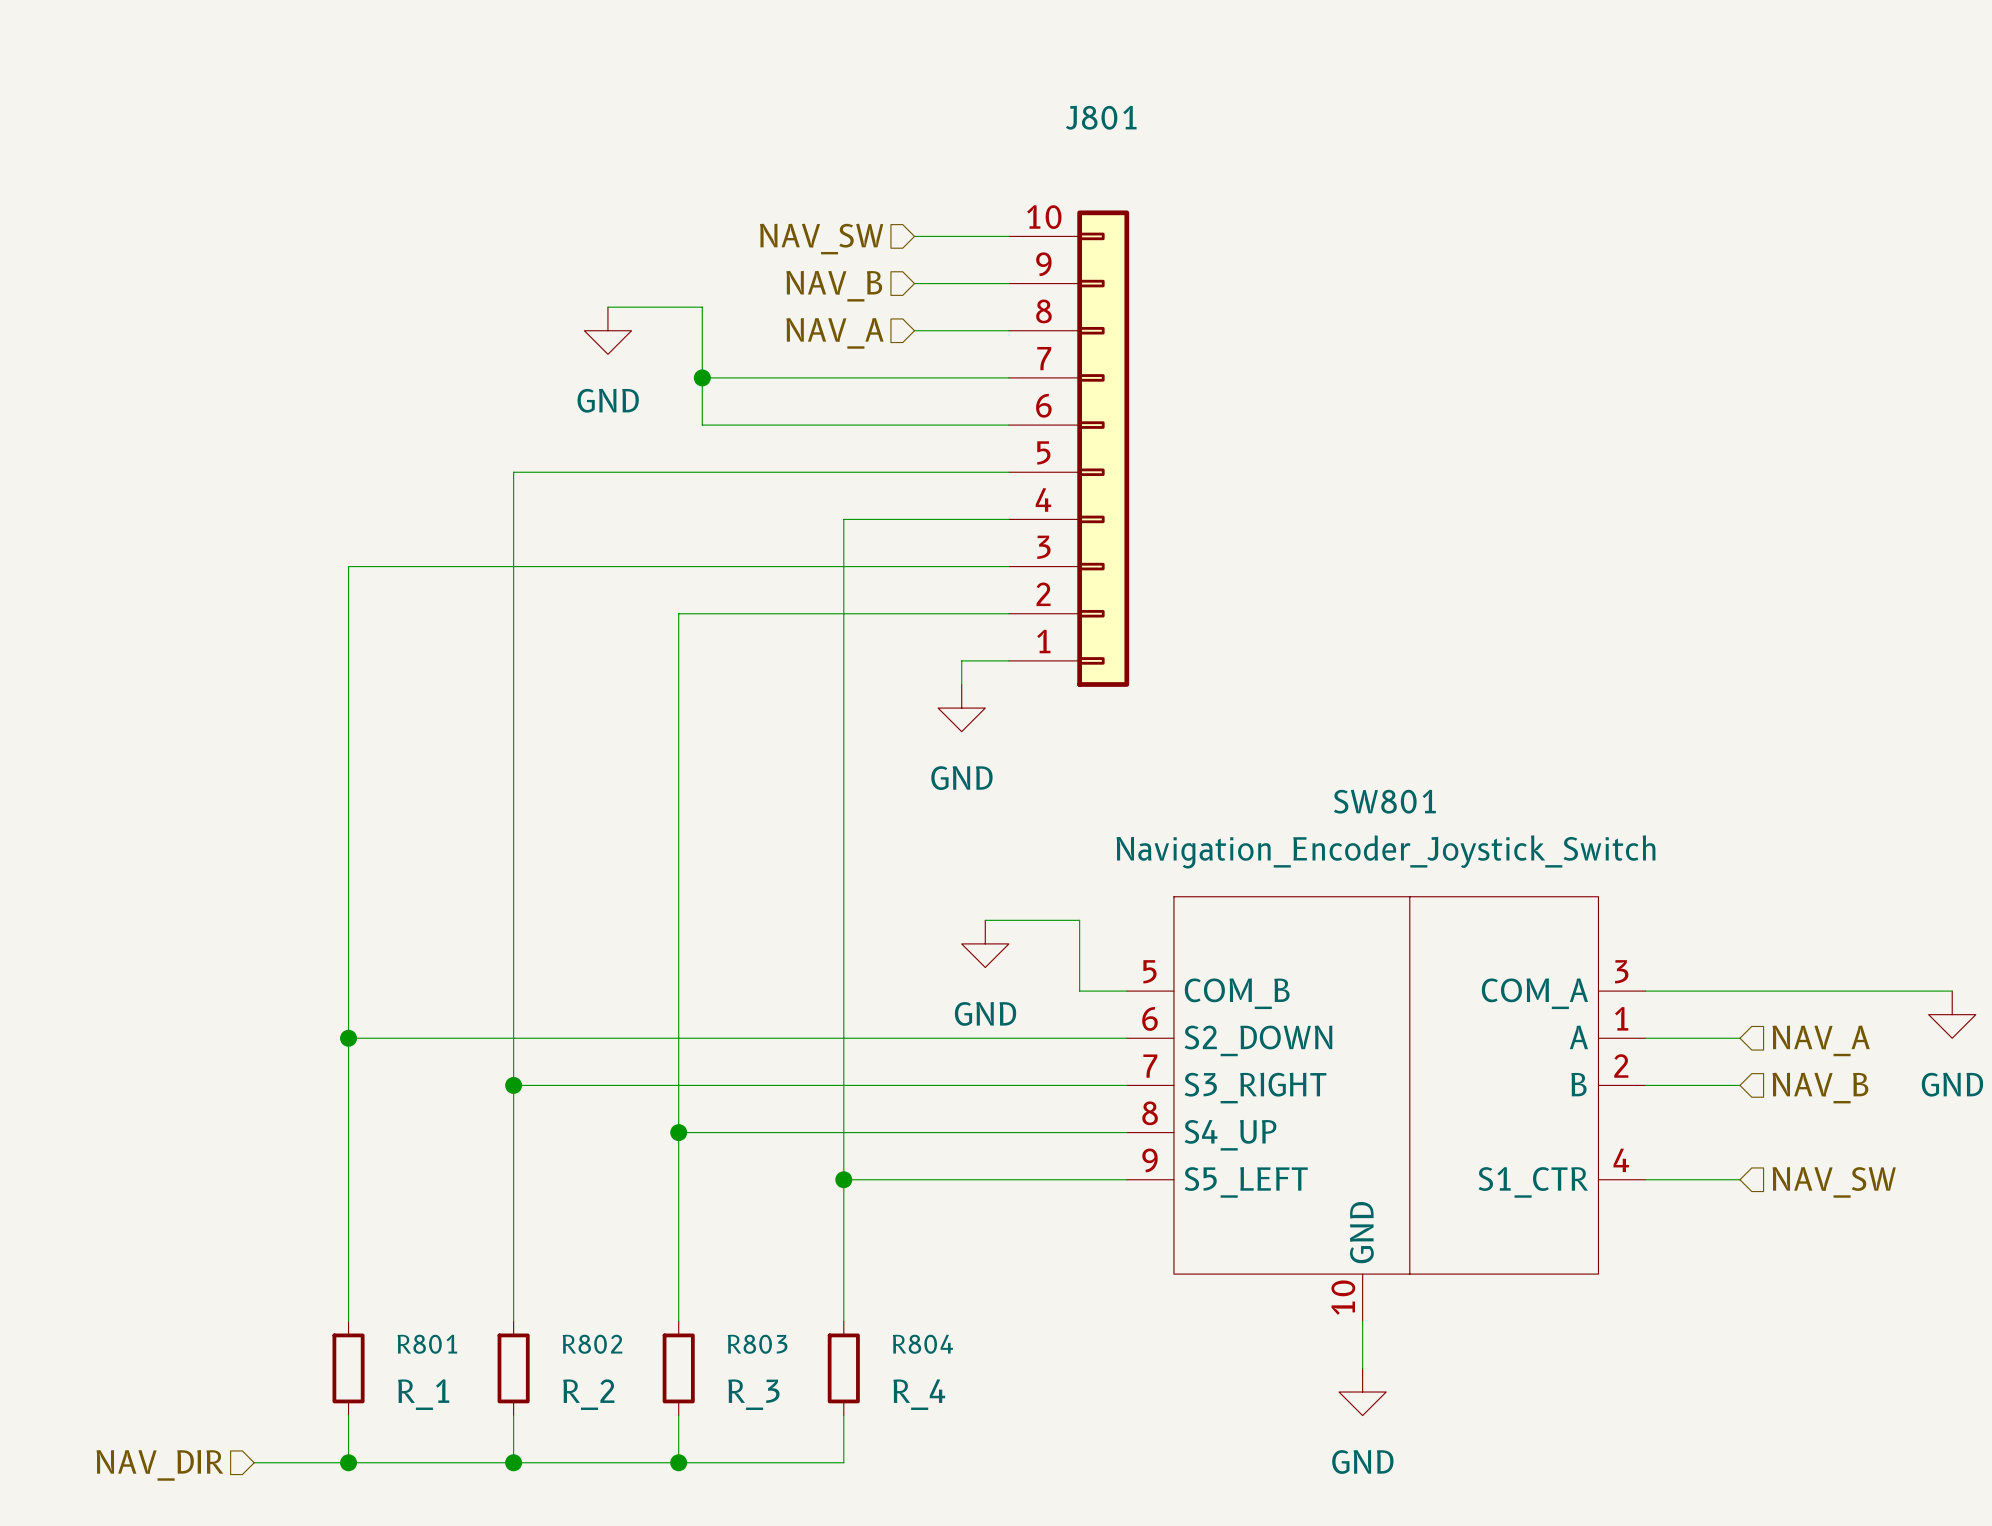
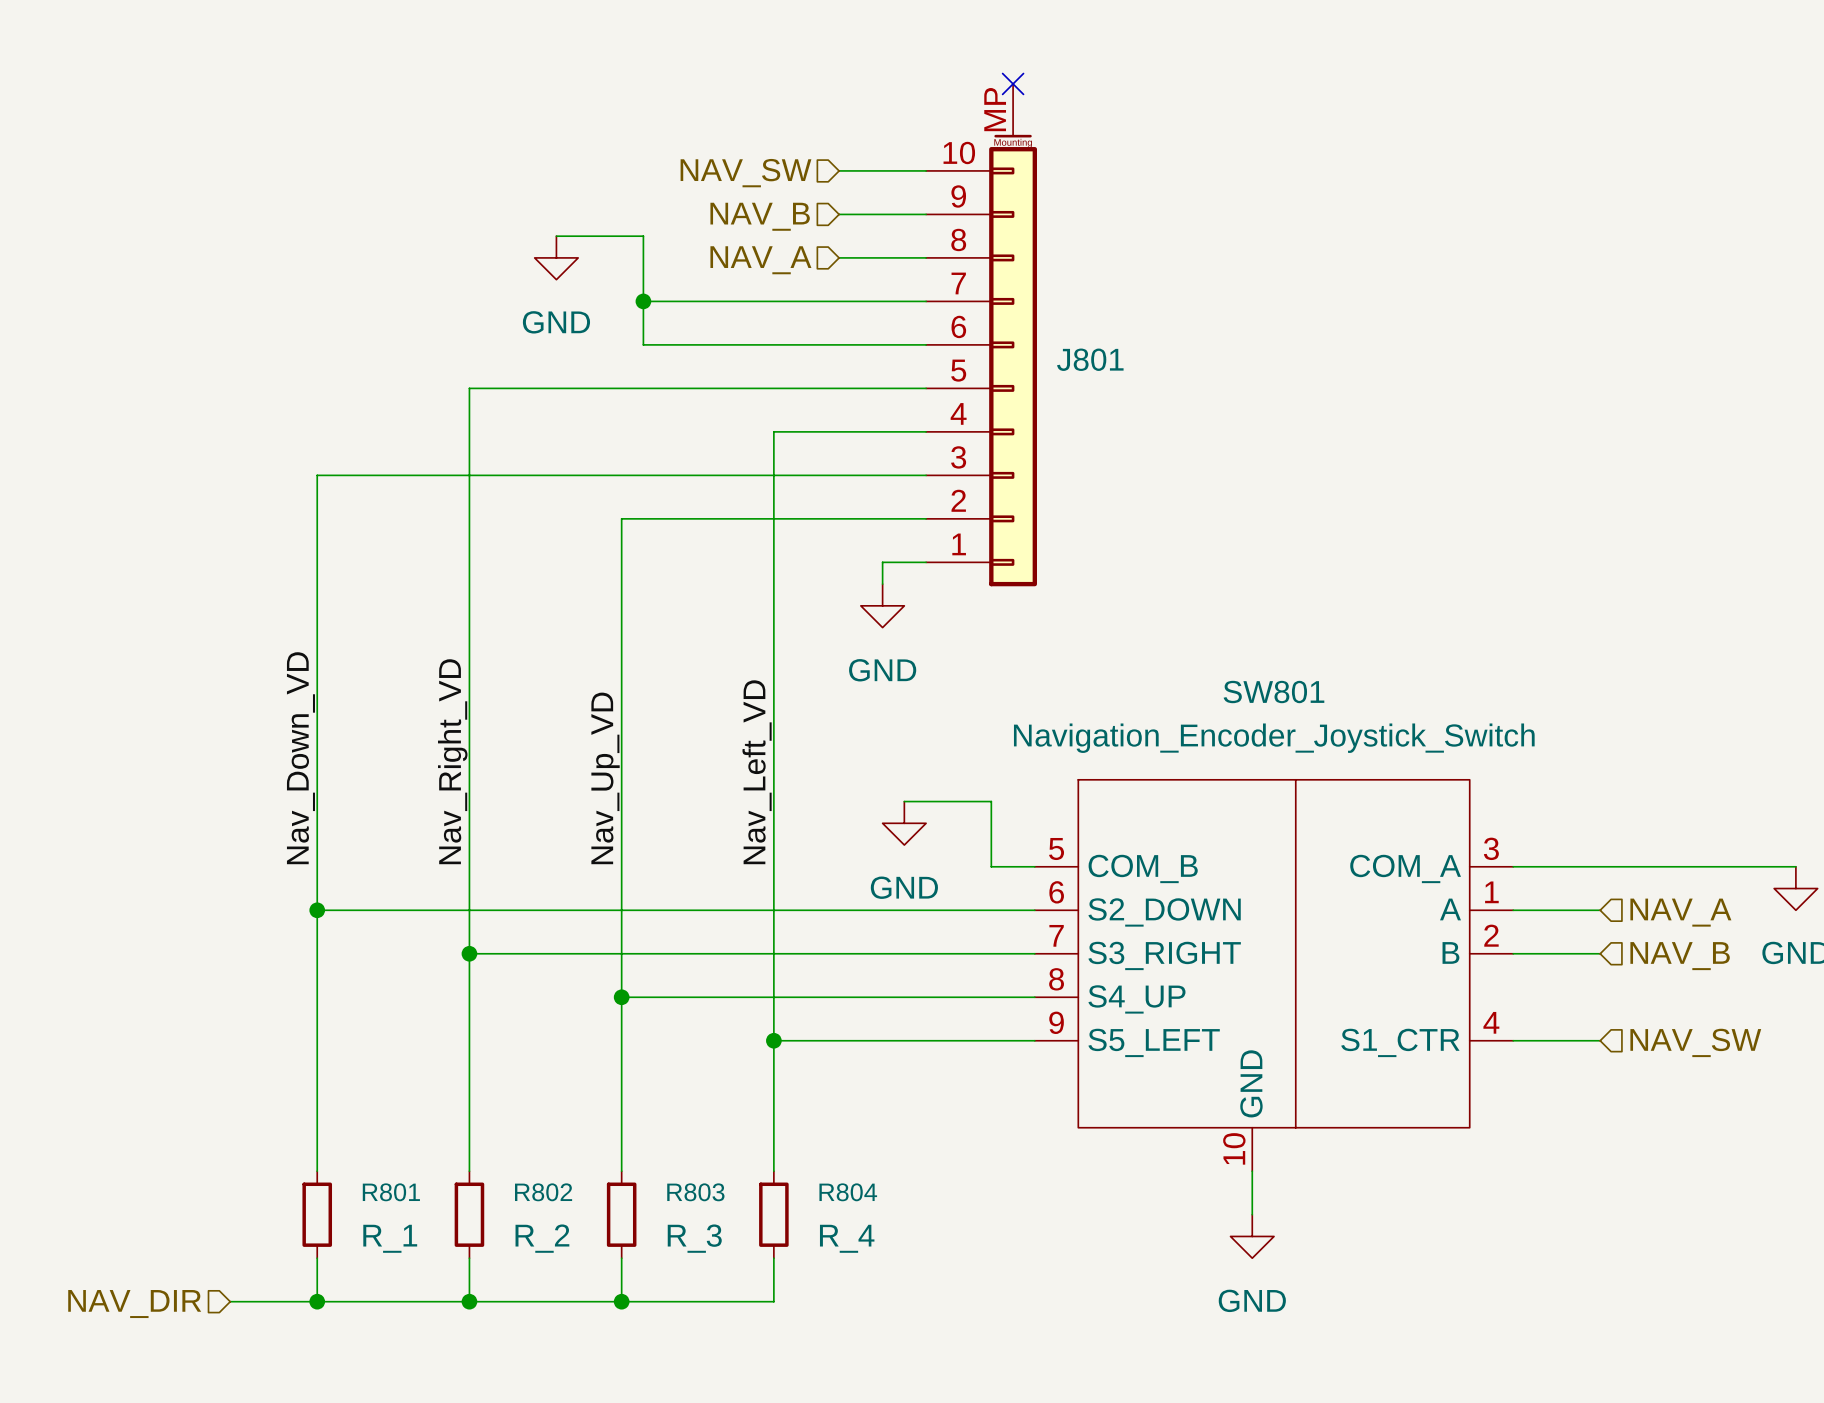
J801 name position: J801 (1101, 117) -> J801 (1090, 359)
no-connect mark: none -> (1013, 83)
J801 symbol: [1008, 210, 1130, 687] -> [926, 83, 1037, 587]
label: none -> Nav_Down_VD (300, 758)
label: none -> Nav_Right_VD (452, 761)
label: none -> Nav_Left_VD (757, 772)
label: none -> Nav_Up_VD (605, 778)

